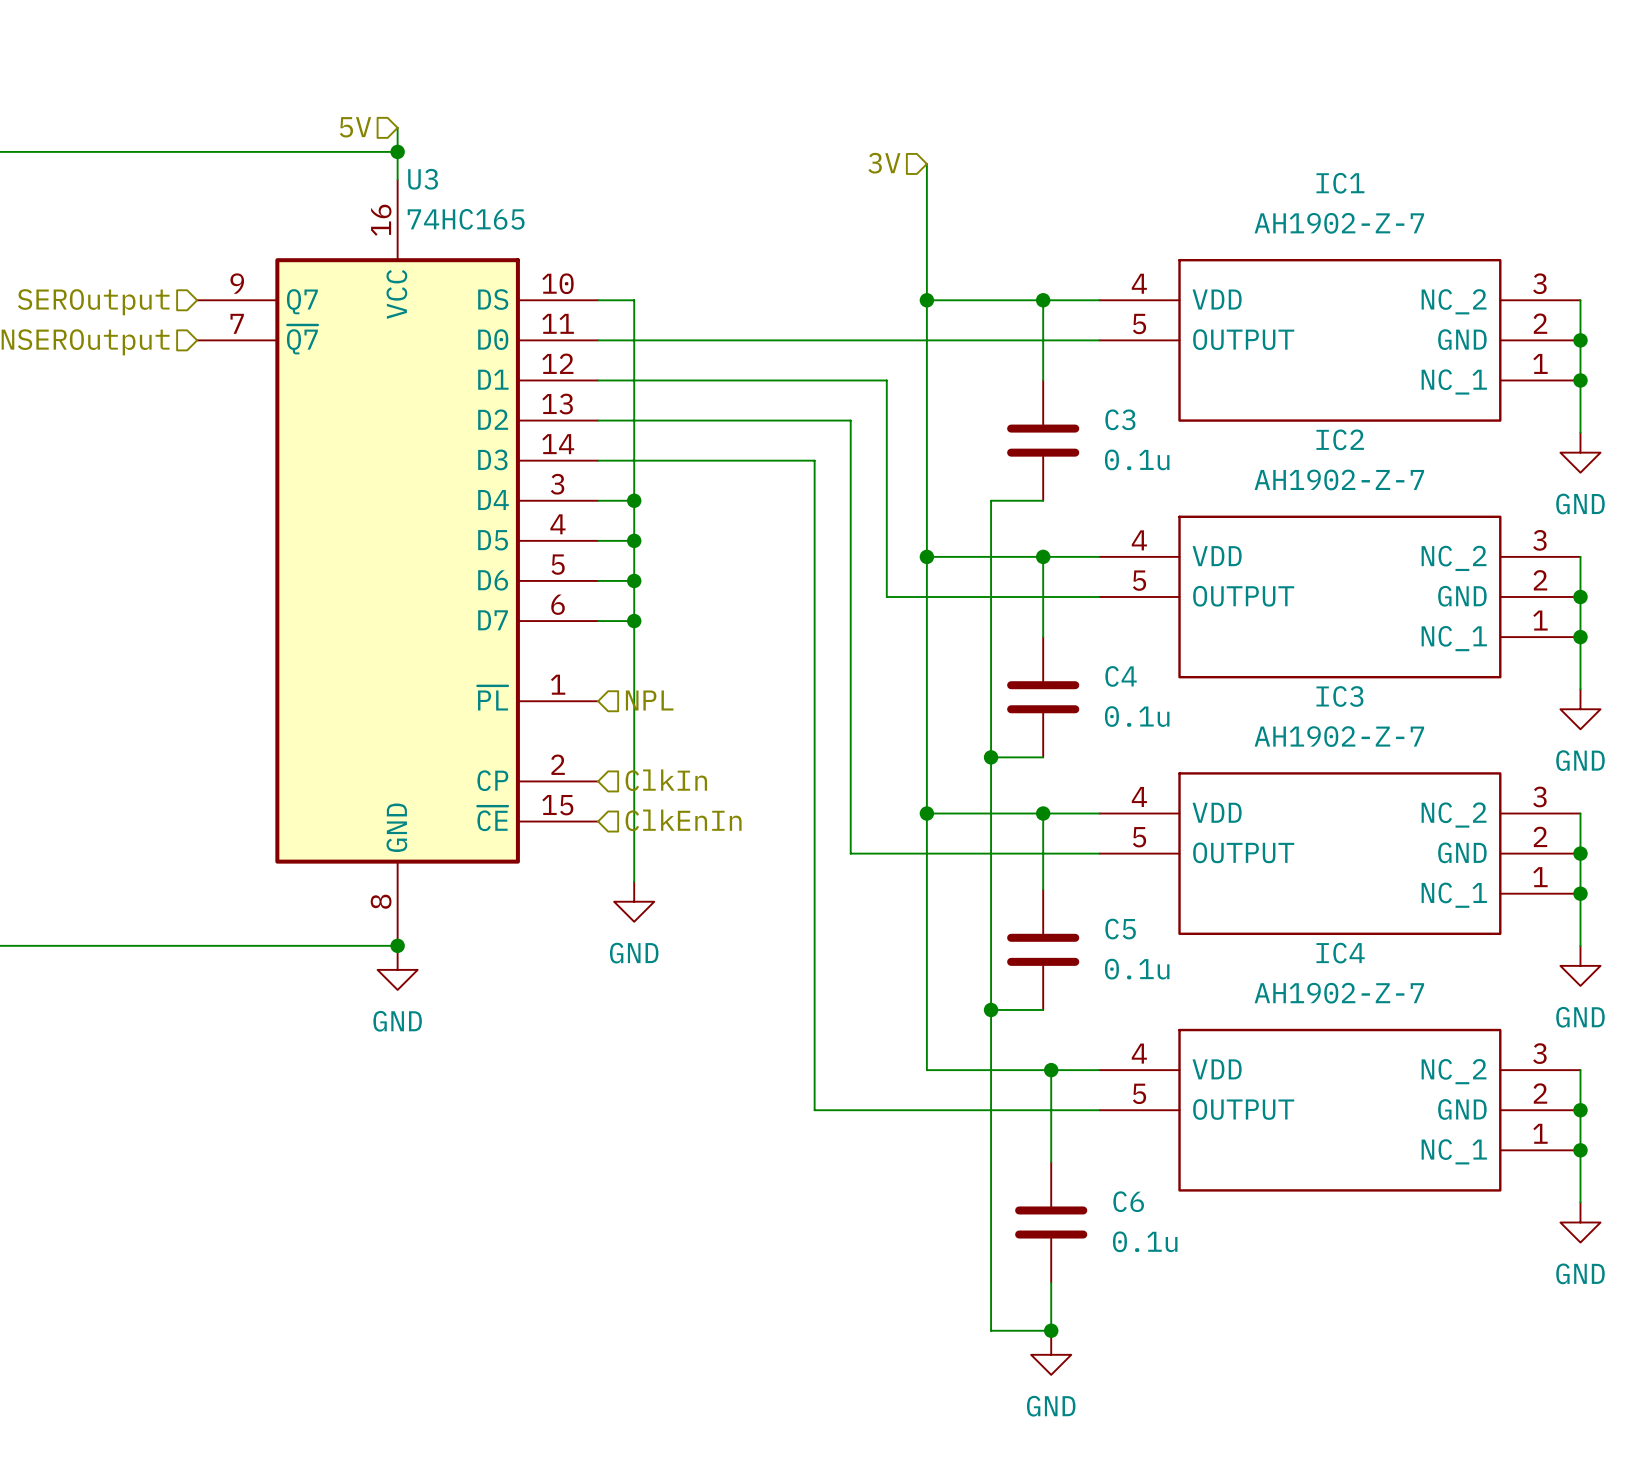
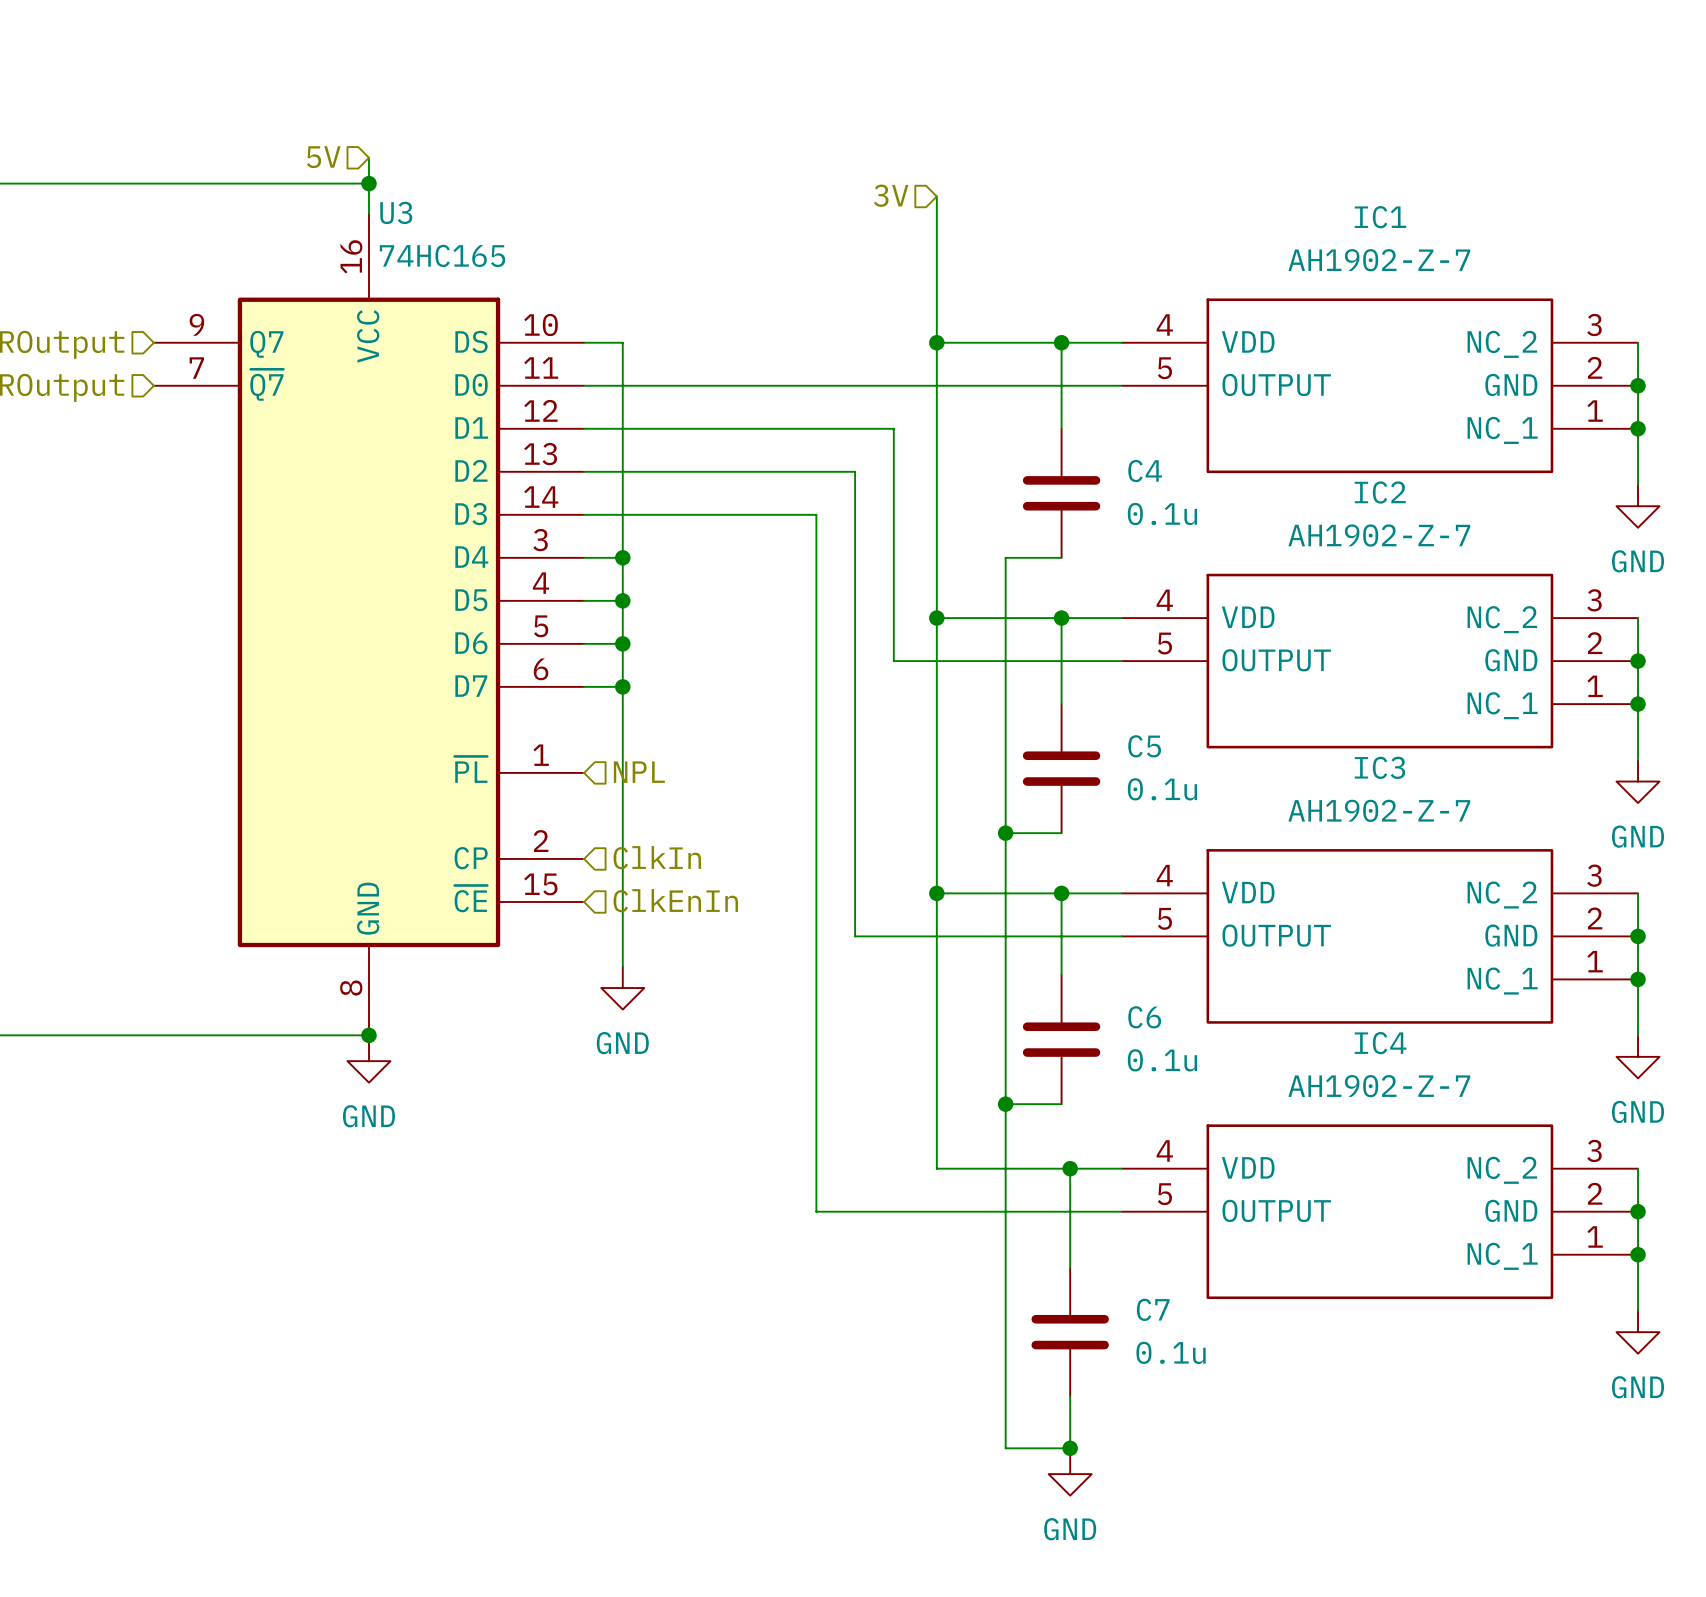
C3 name: C3 (1120, 419) -> C4 (1145, 471)
C4 name: C4 (1121, 676) -> C5 (1144, 746)
C5 name: C5 (1120, 929) -> C6 (1144, 1017)
C6 name: C6 (1128, 1201) -> C7 (1153, 1309)

